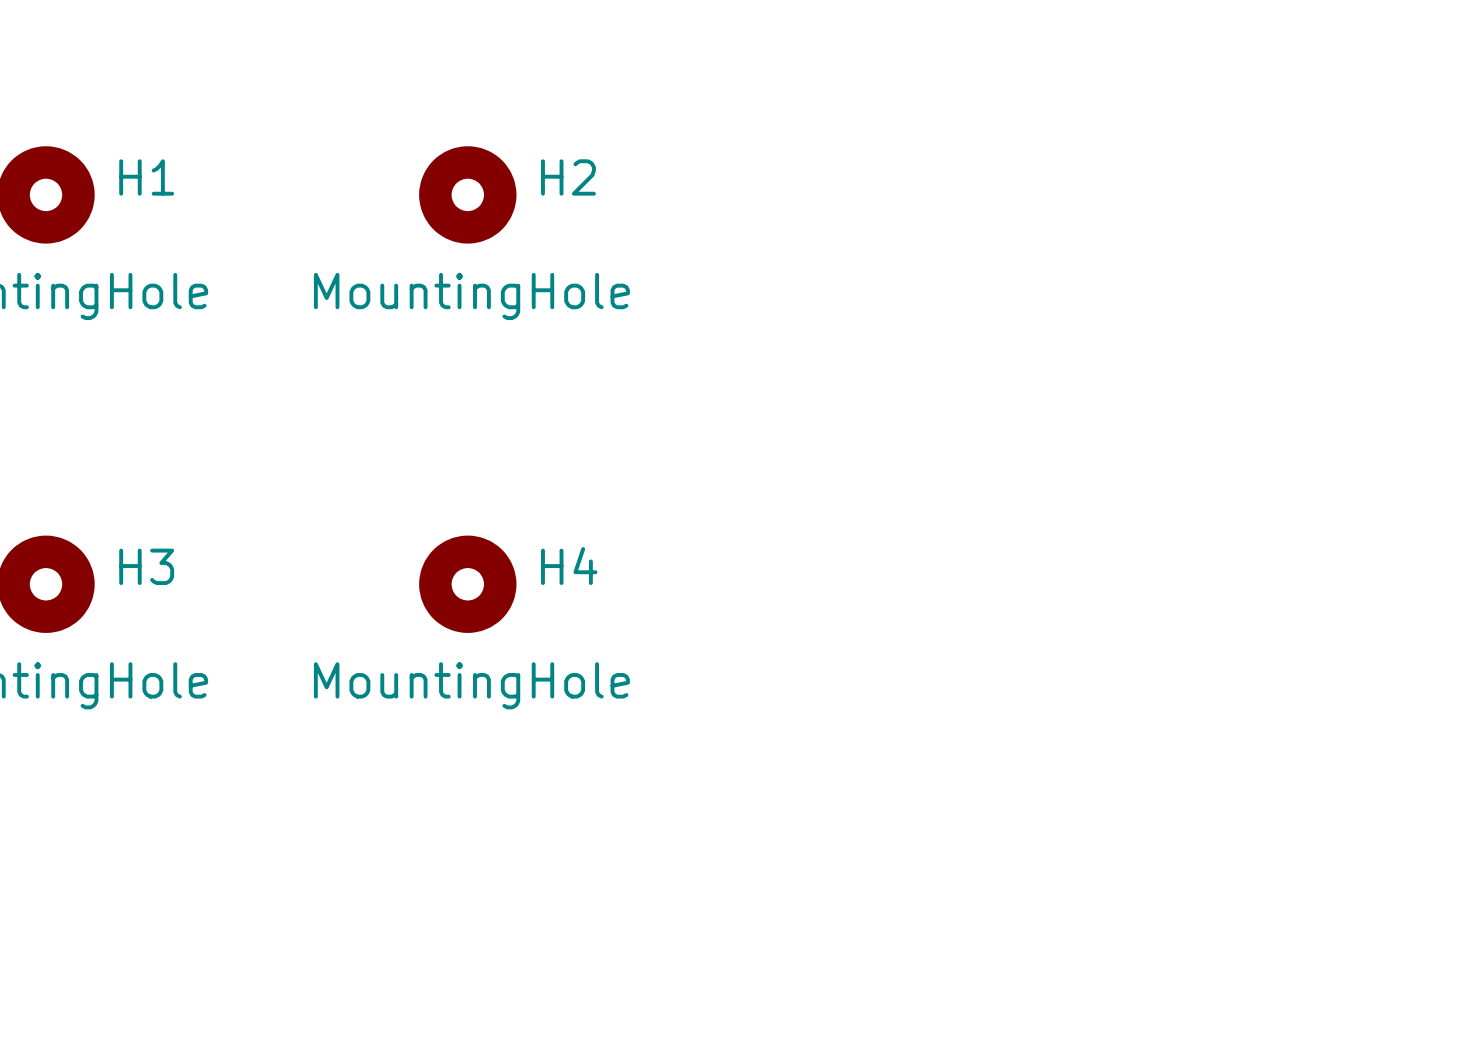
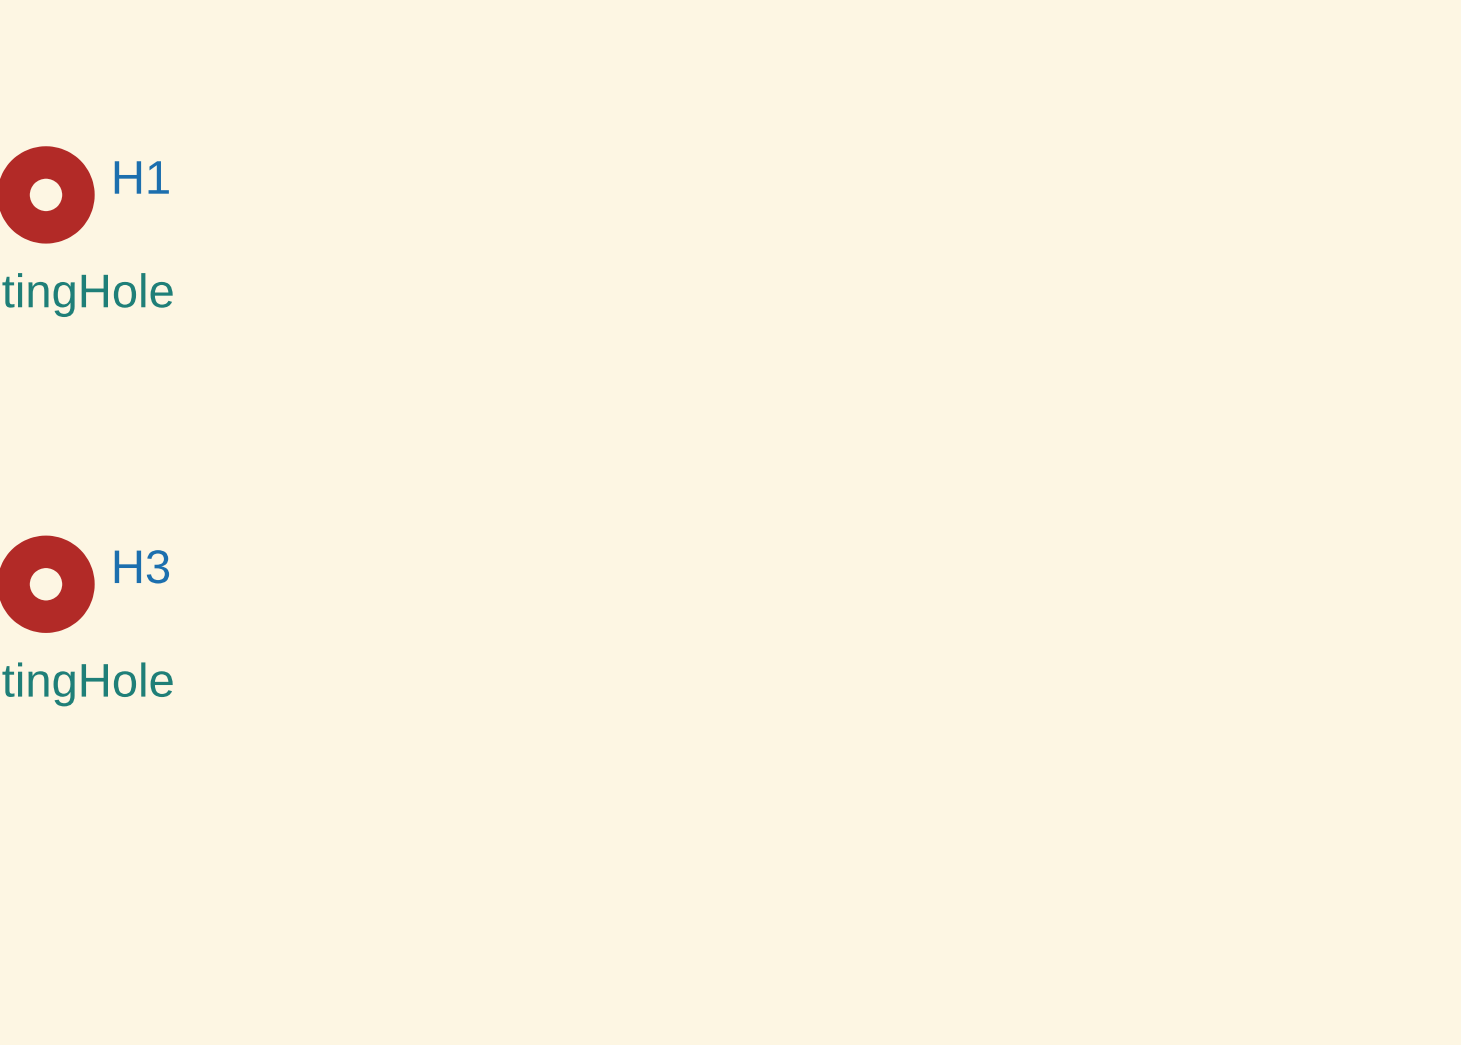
H2: MountingHole (467, 194) -> none
H4: MountingHole (467, 584) -> none

